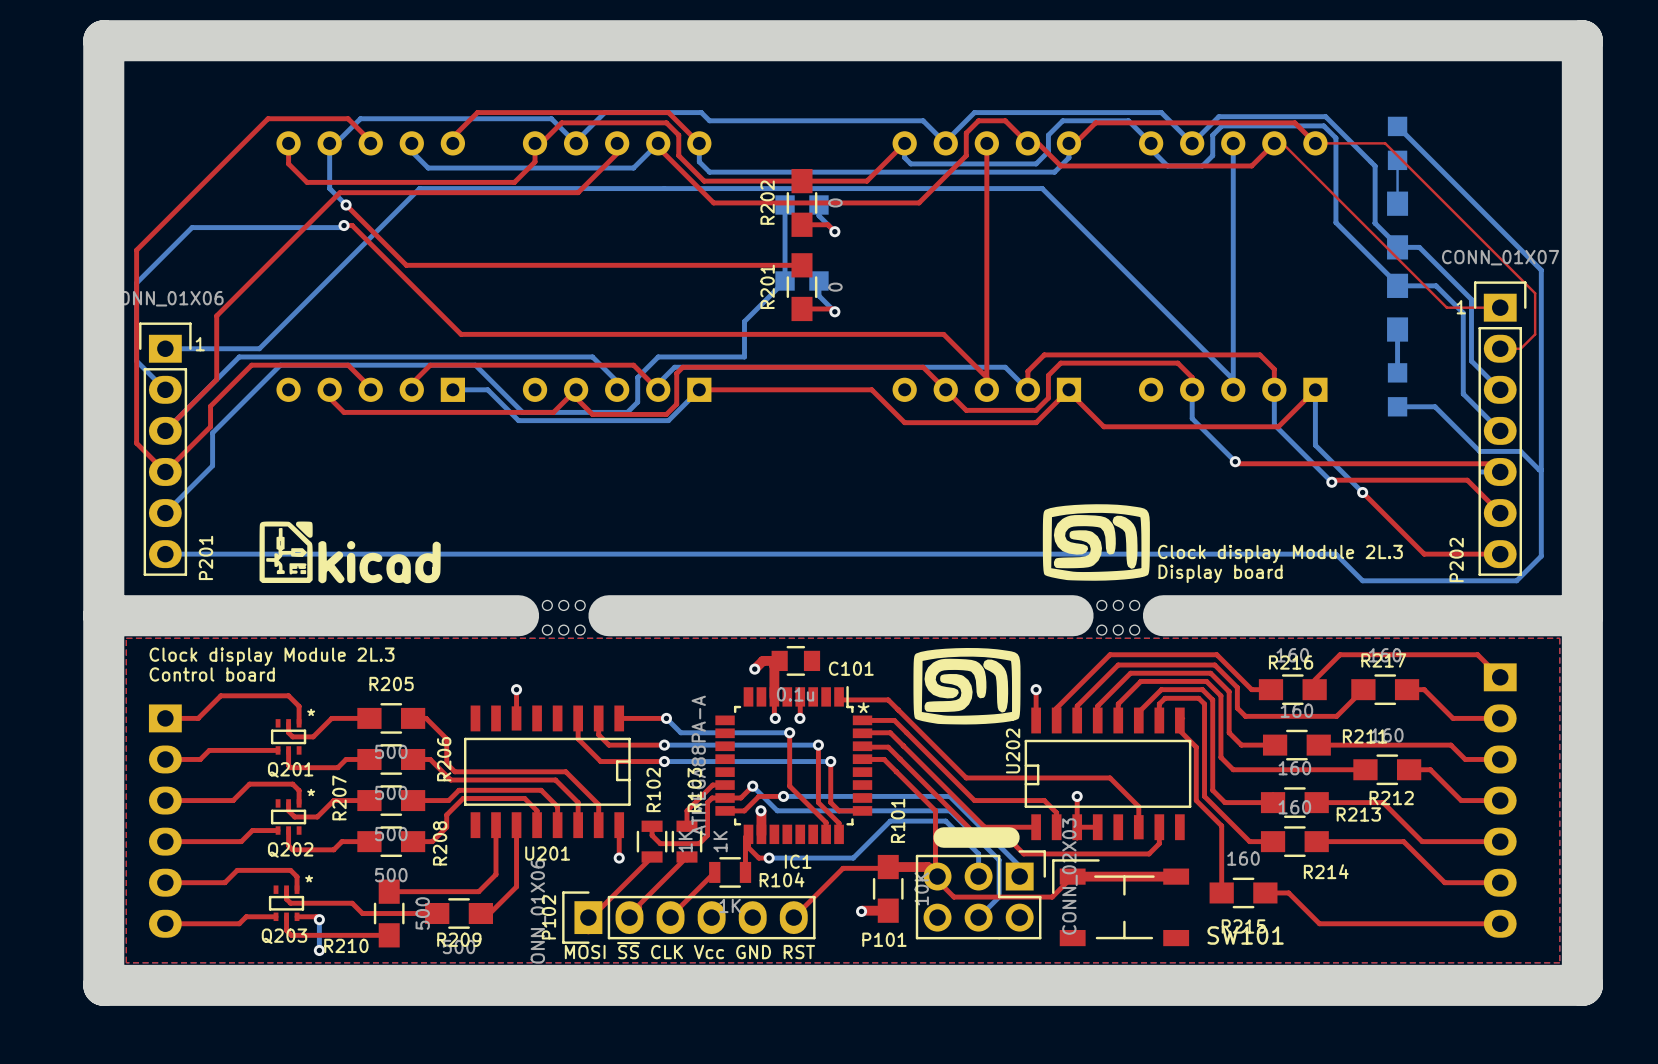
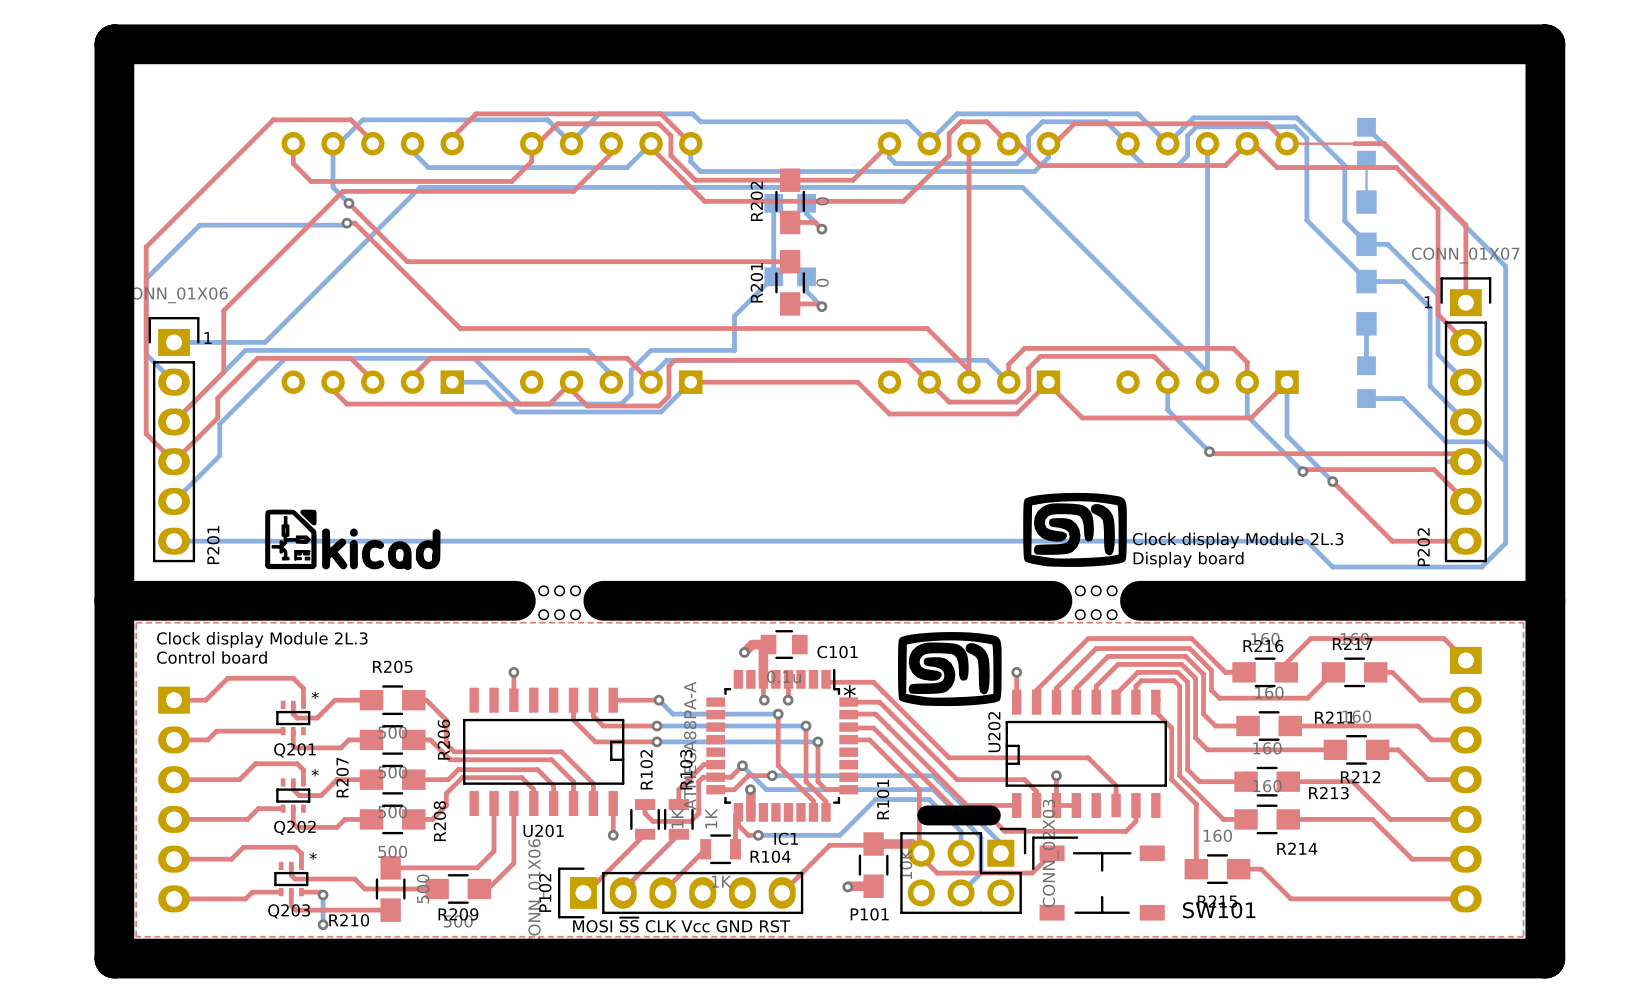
top track: (1278, 143) (1282, 143) (1446, 307) (1500, 307) -> none
top track: none -> (1253, 143) (1277, 167) (1396, 167) (1438, 209) (1438, 314) (1465, 342)
top track: (1385, 143) (1535, 293) (1535, 334) (1520, 348) (1500, 348) -> (1354, 143) (1384, 143) (1465, 225) (1465, 302)
top track: (1072, 876) (1176, 876) -> none

